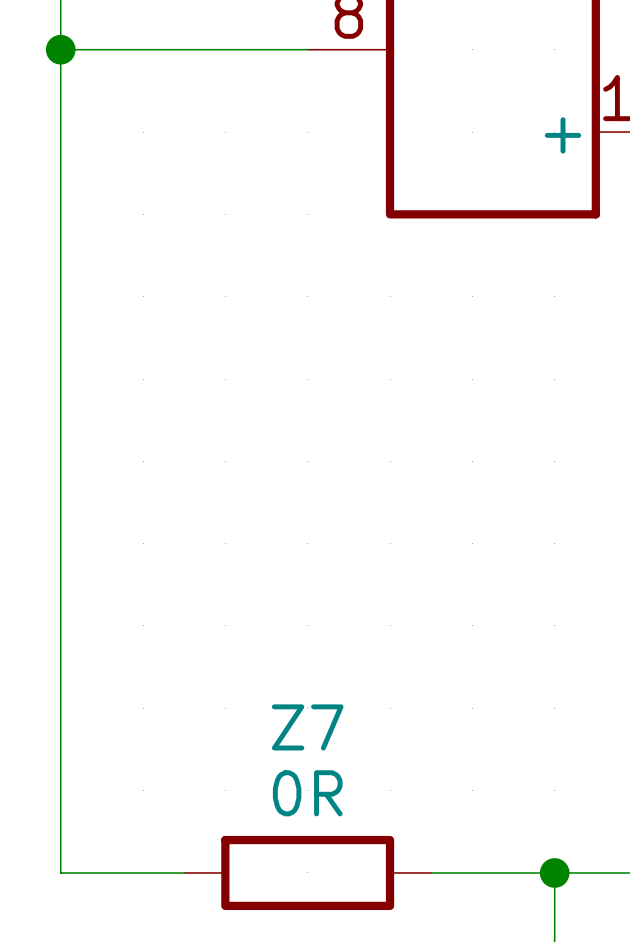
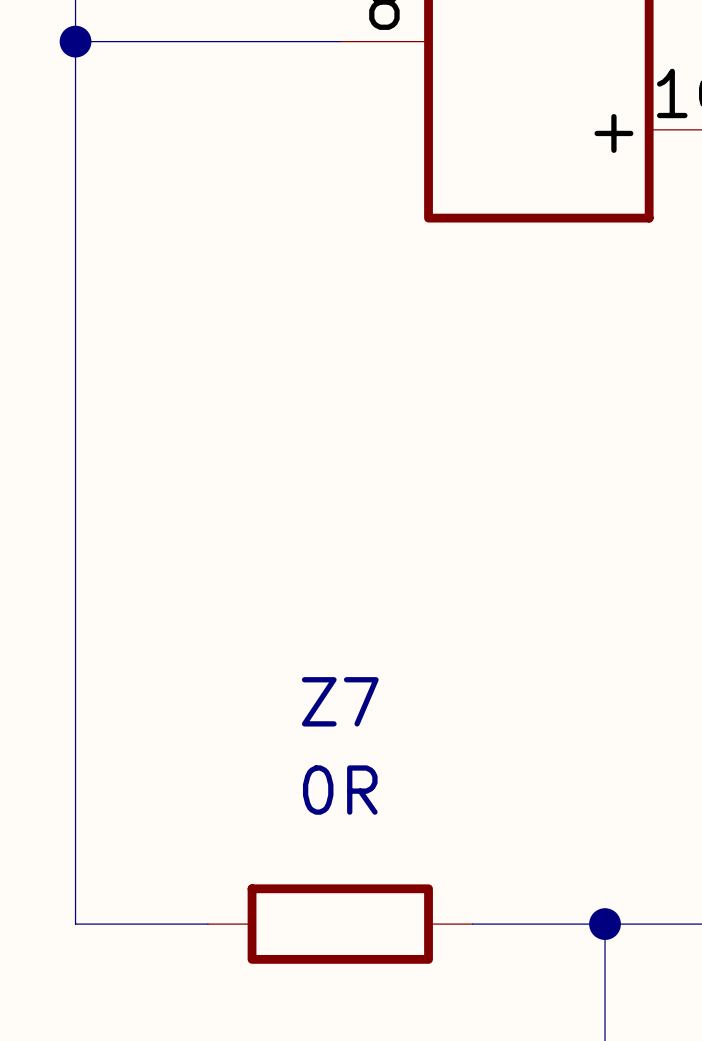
Z7 name position: Z7 (307, 727) -> Z7 (340, 701)
Z7 value position: 0R (307, 793) -> 0R (340, 790)

